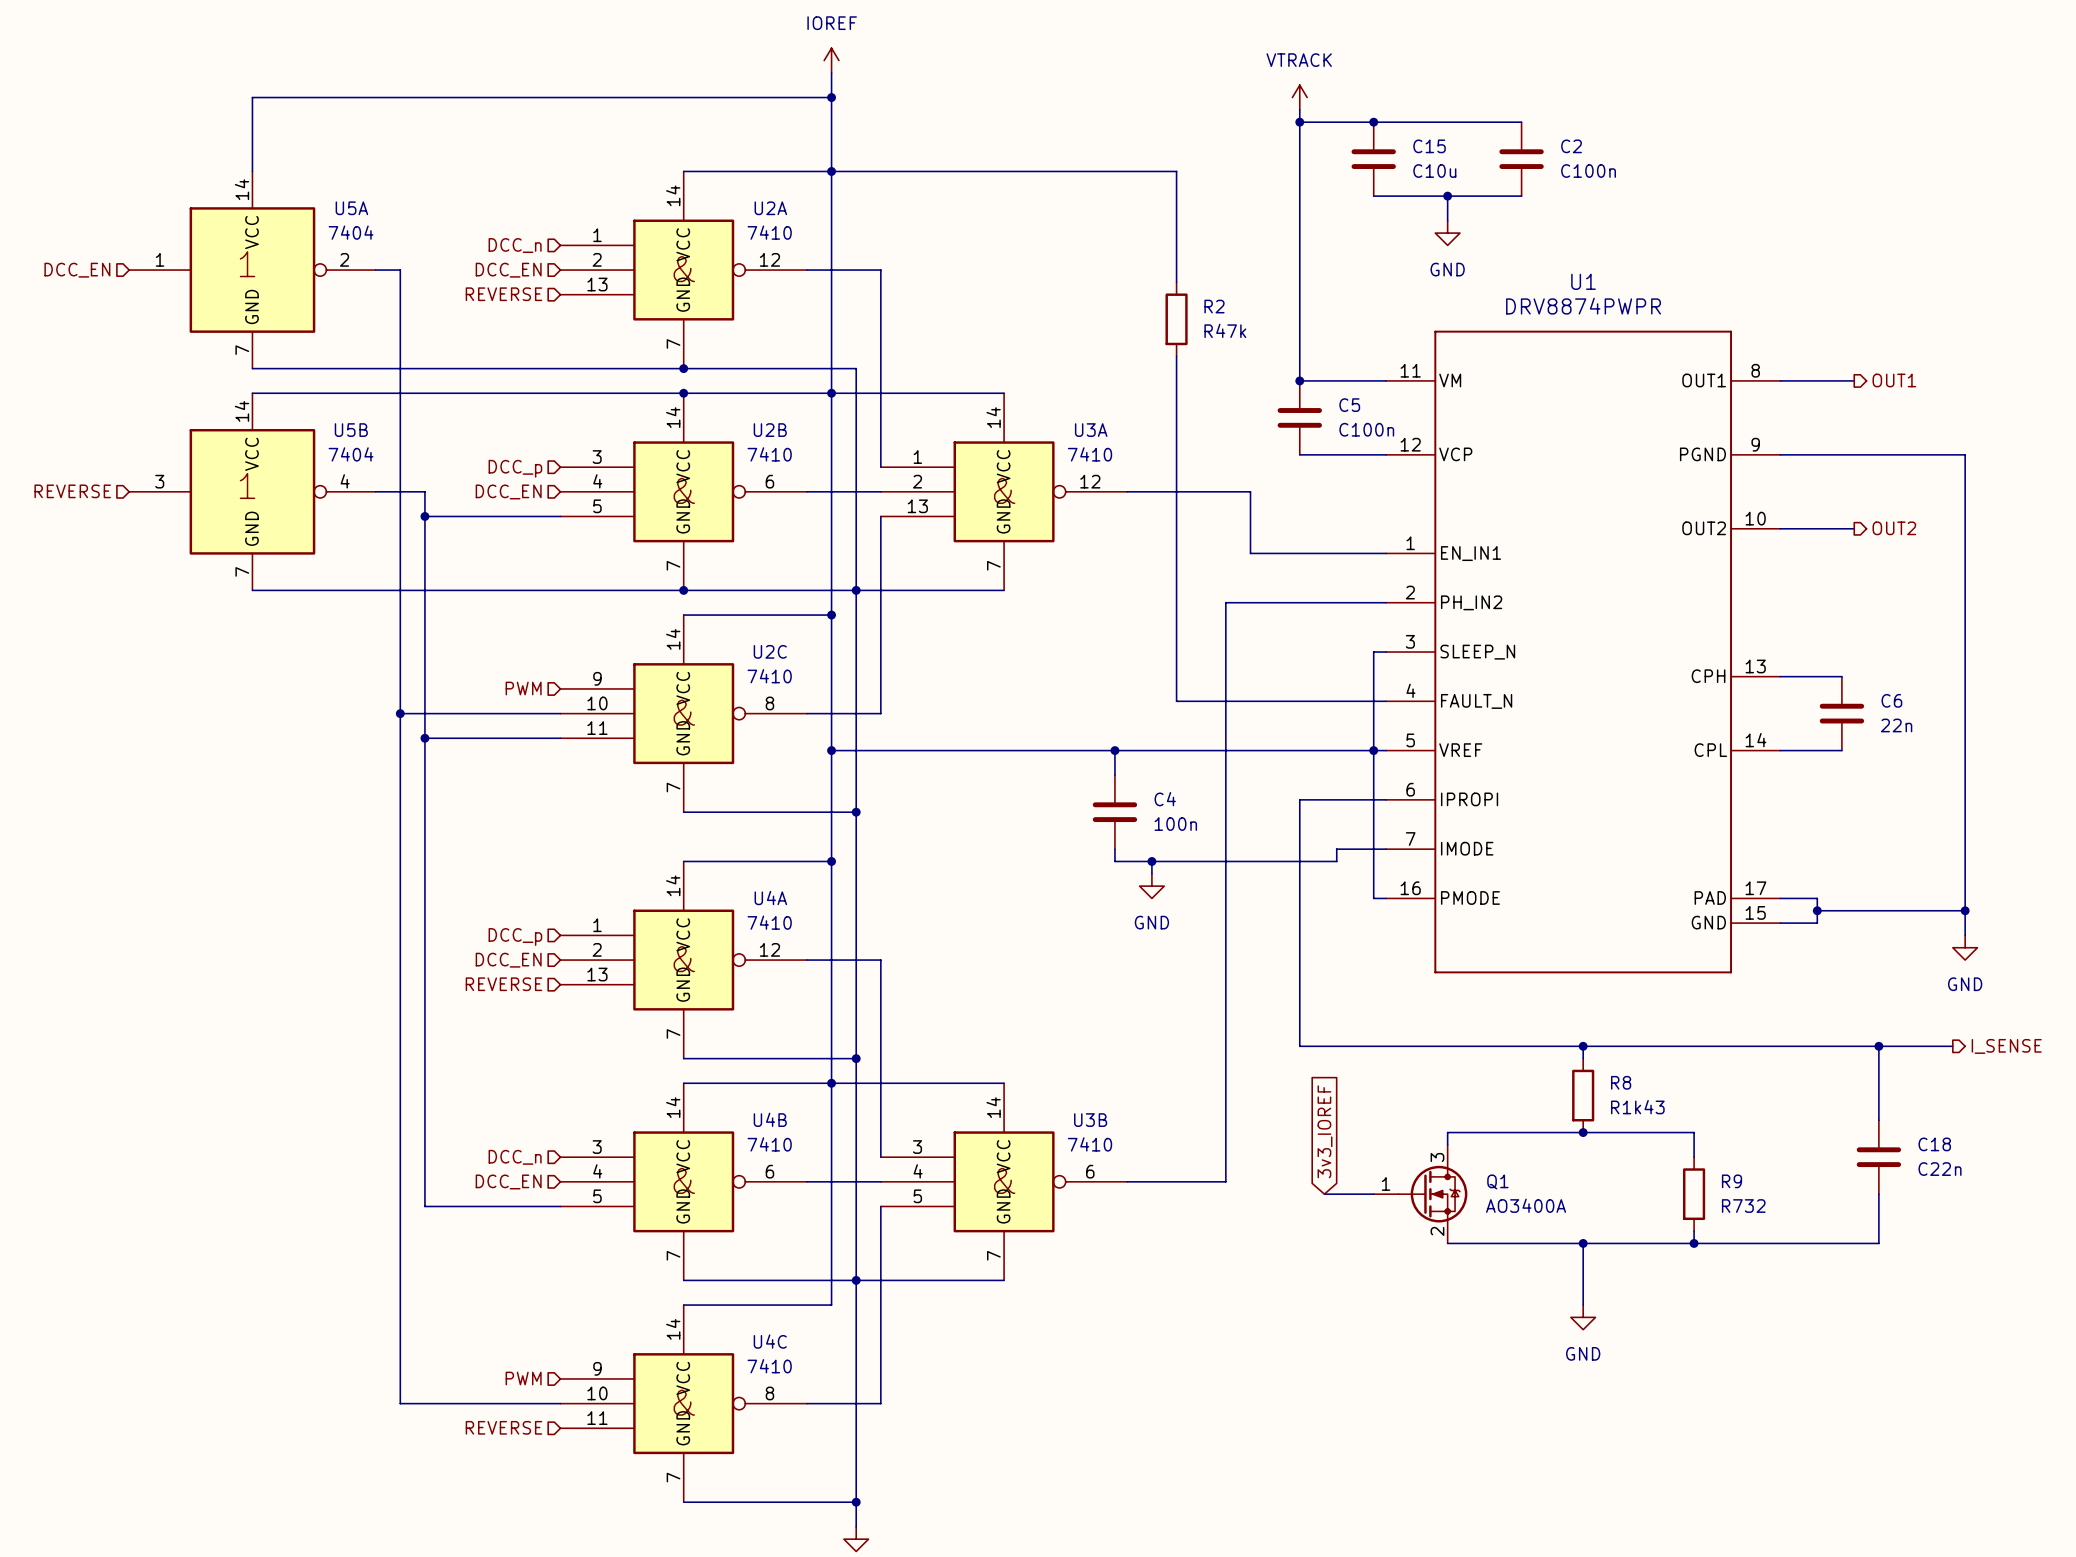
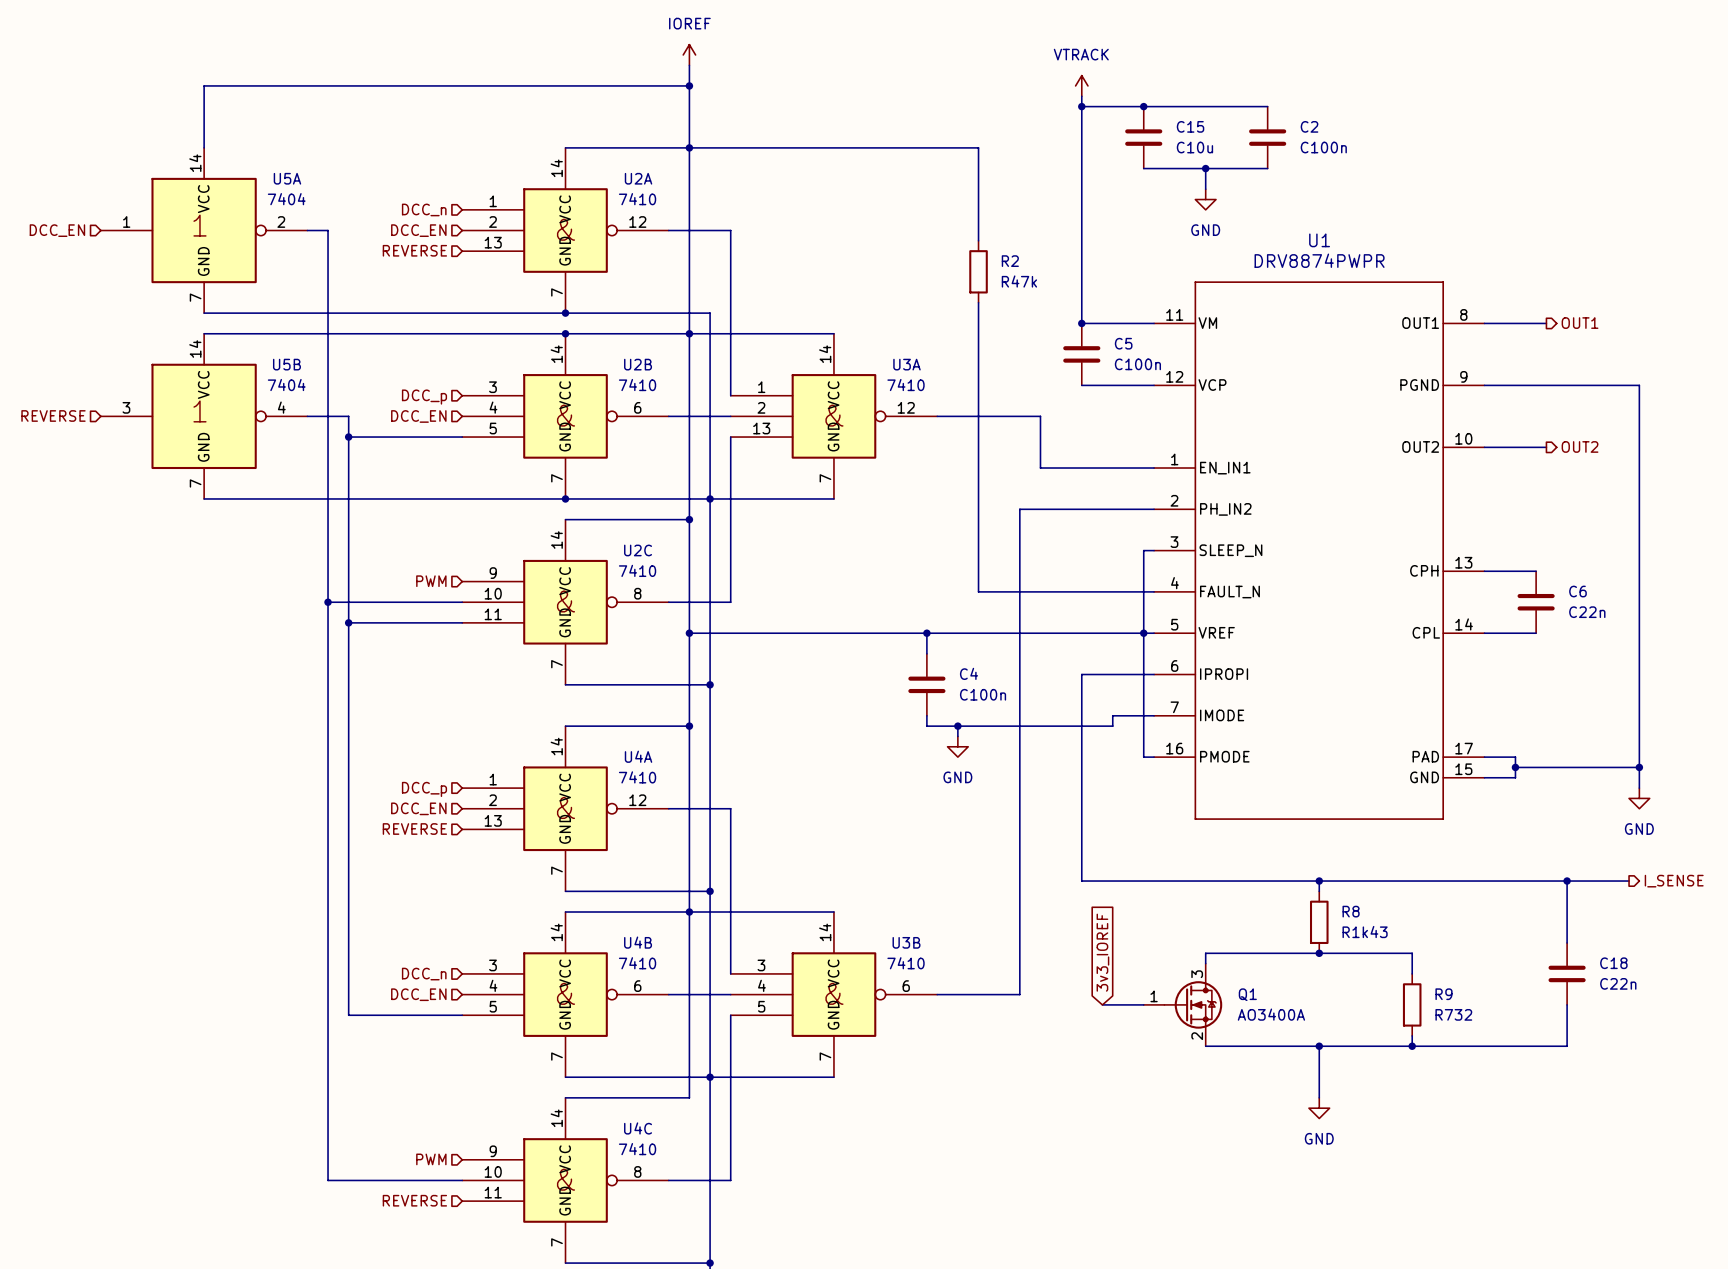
C6 value: 22n (1896, 725) -> C22n (1587, 612)
C4 value: 100n (1175, 824) -> C100n (983, 694)

